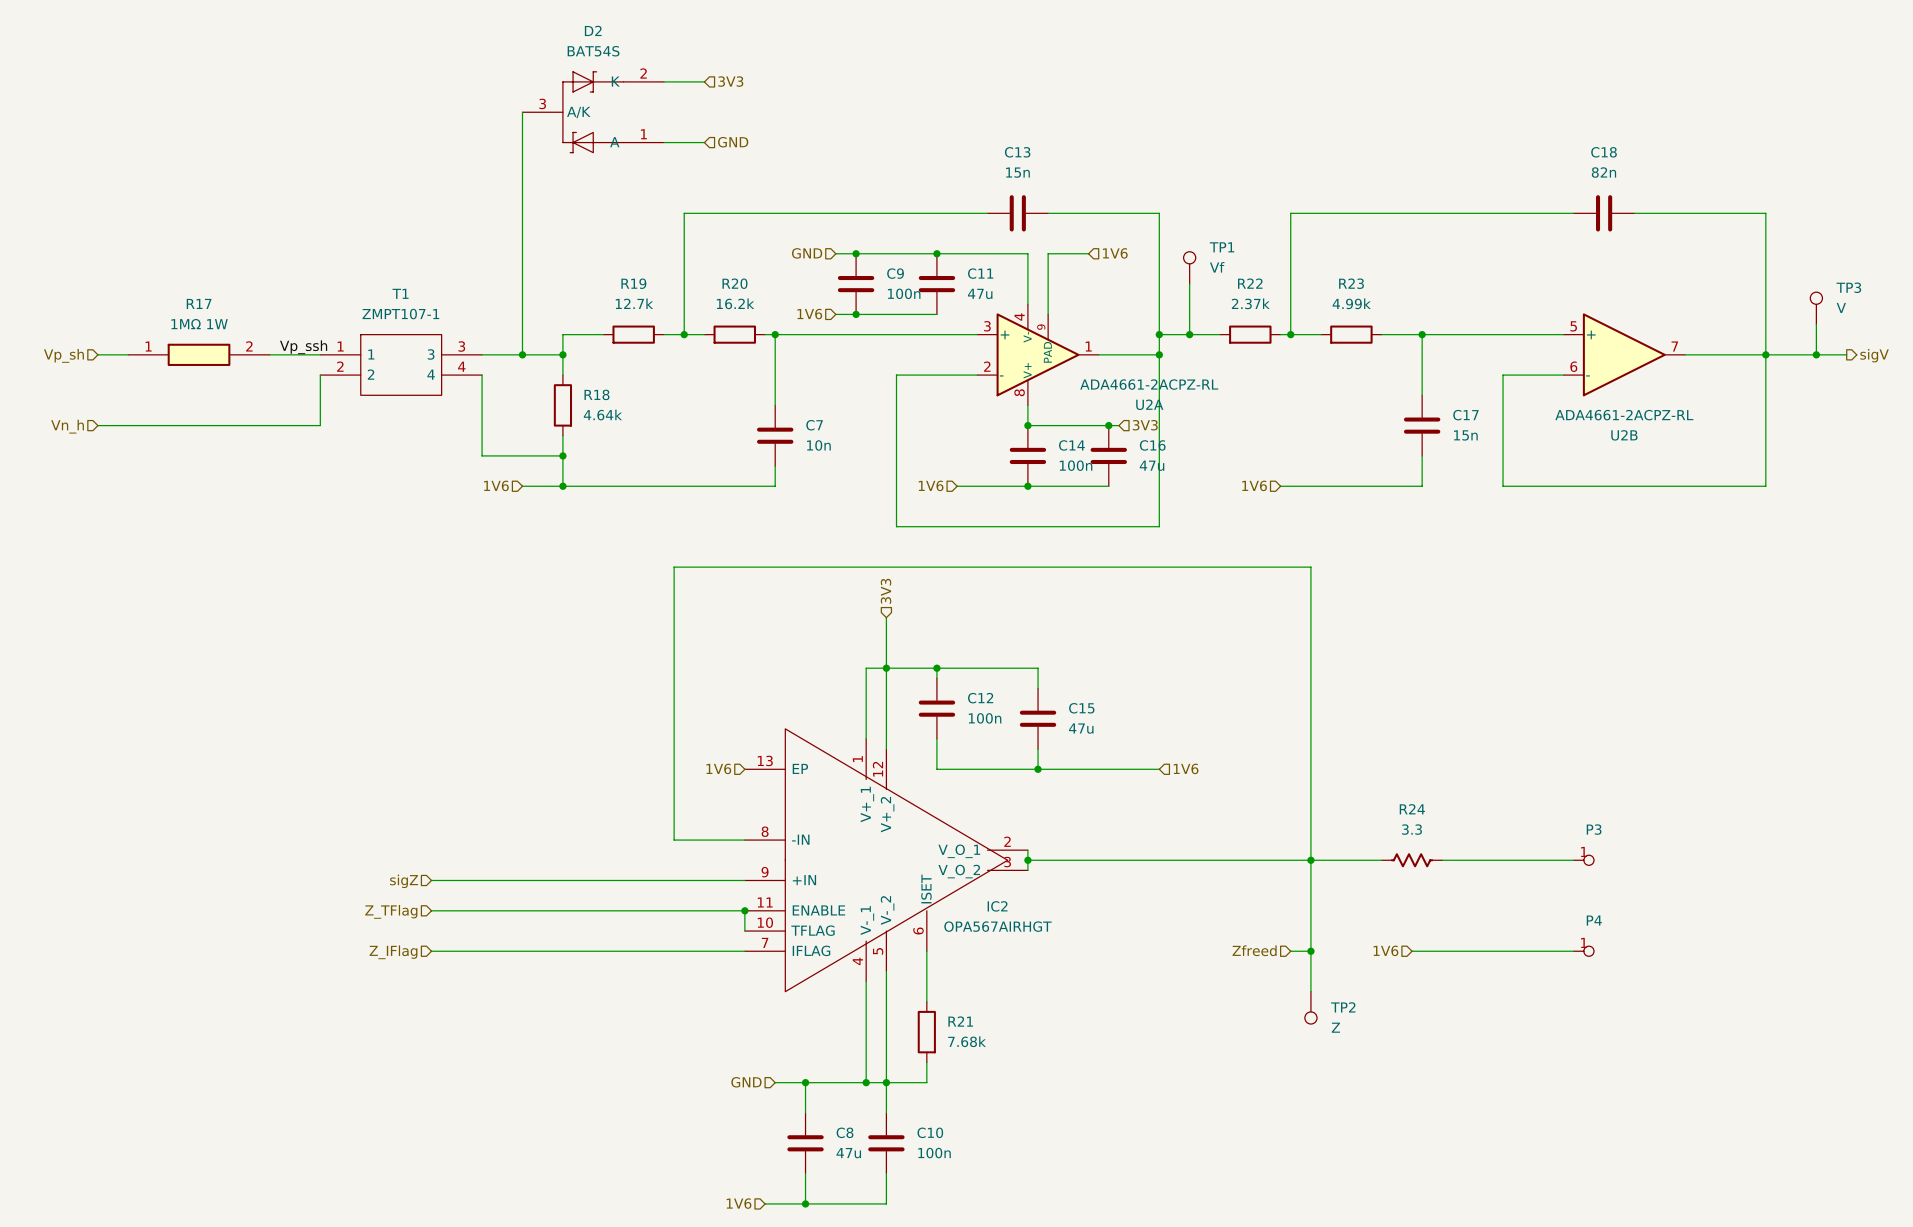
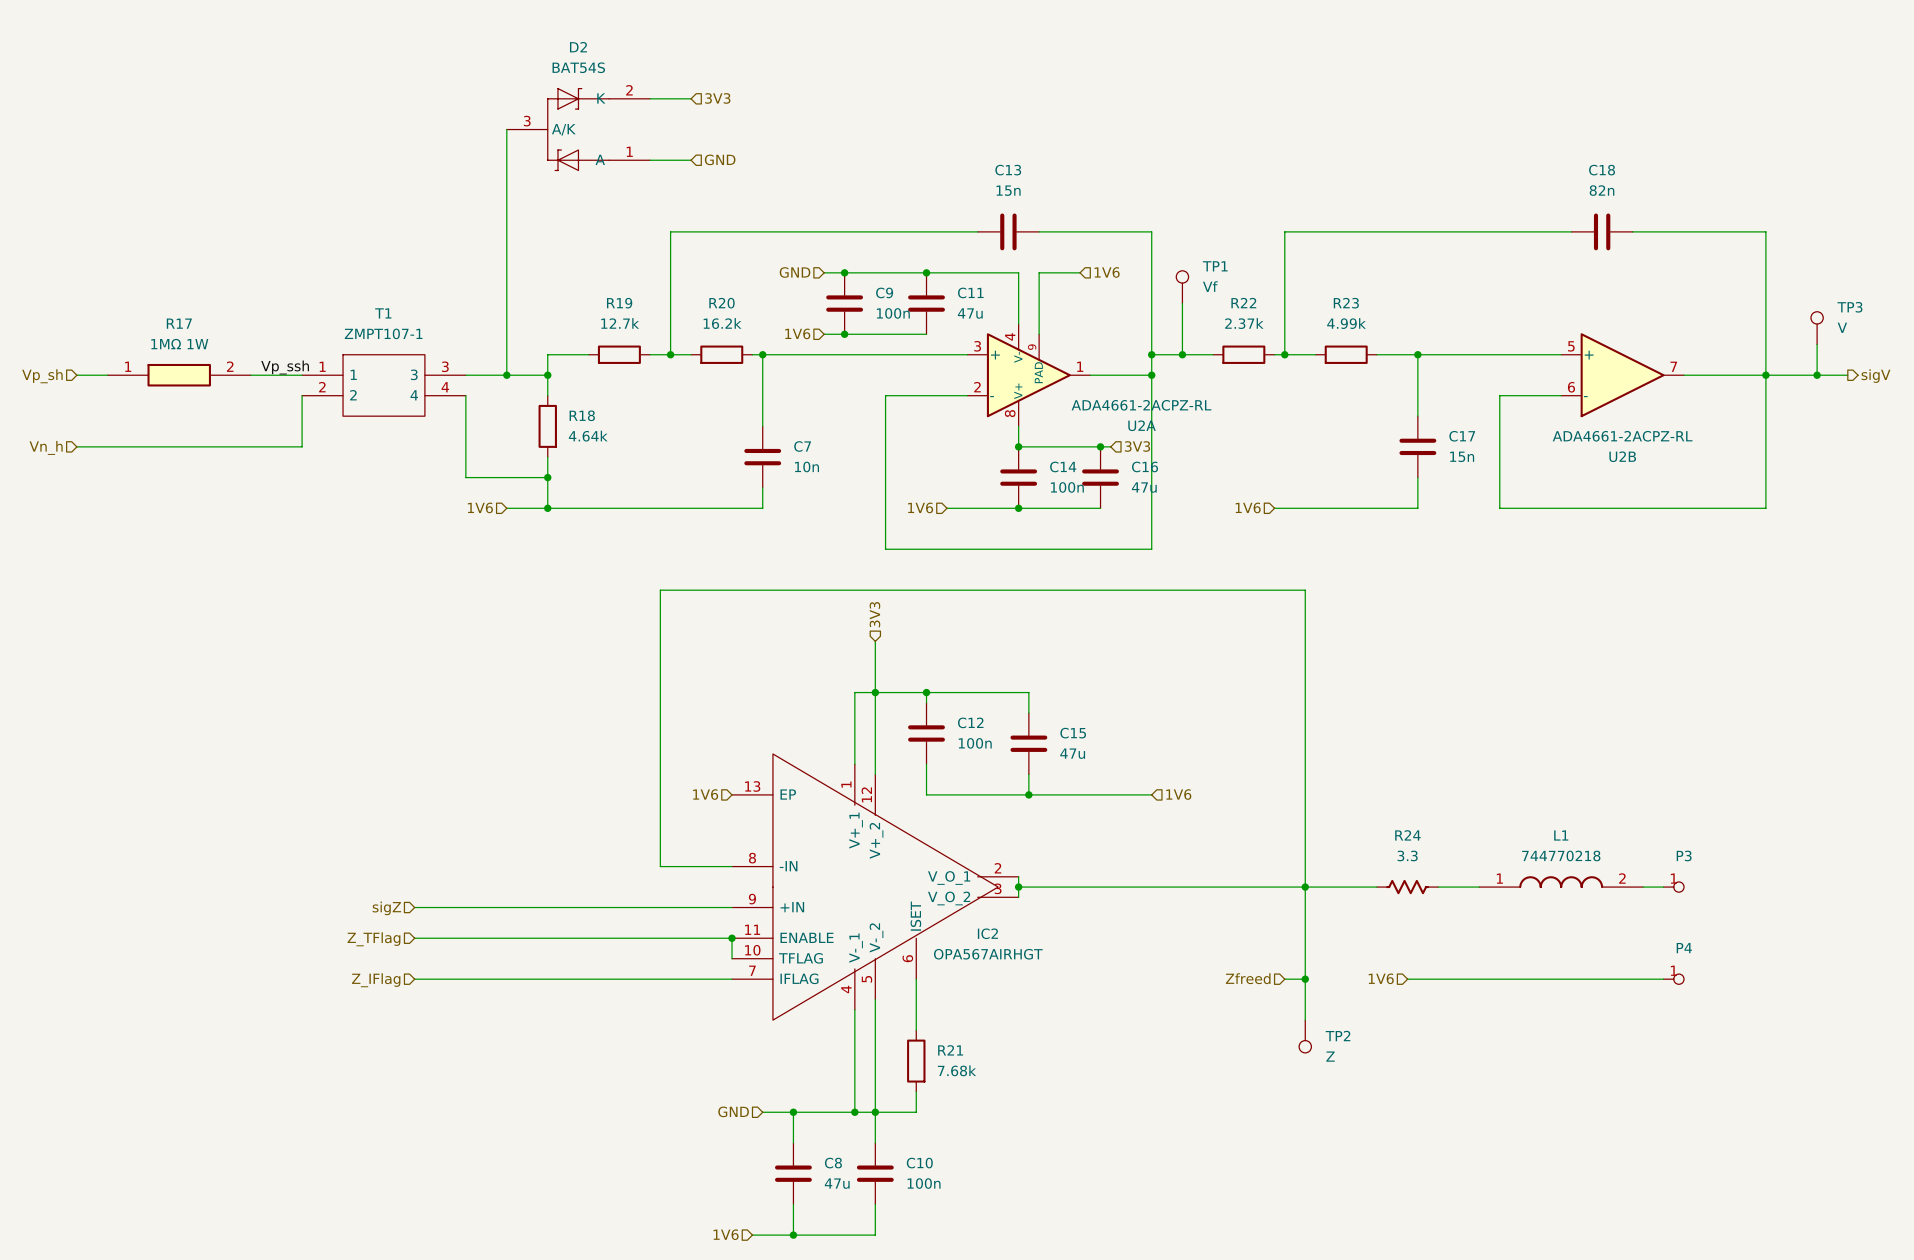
L1: none -> 744770218 (1561, 882)
wire: (1482, 860) (1573, 860) -> (1571, 979) (1663, 979)
P3 position: (1583, 860) -> (1673, 887)
wire: none -> (1643, 887) (1663, 887)
P4 position: (1583, 951) -> (1673, 979)

